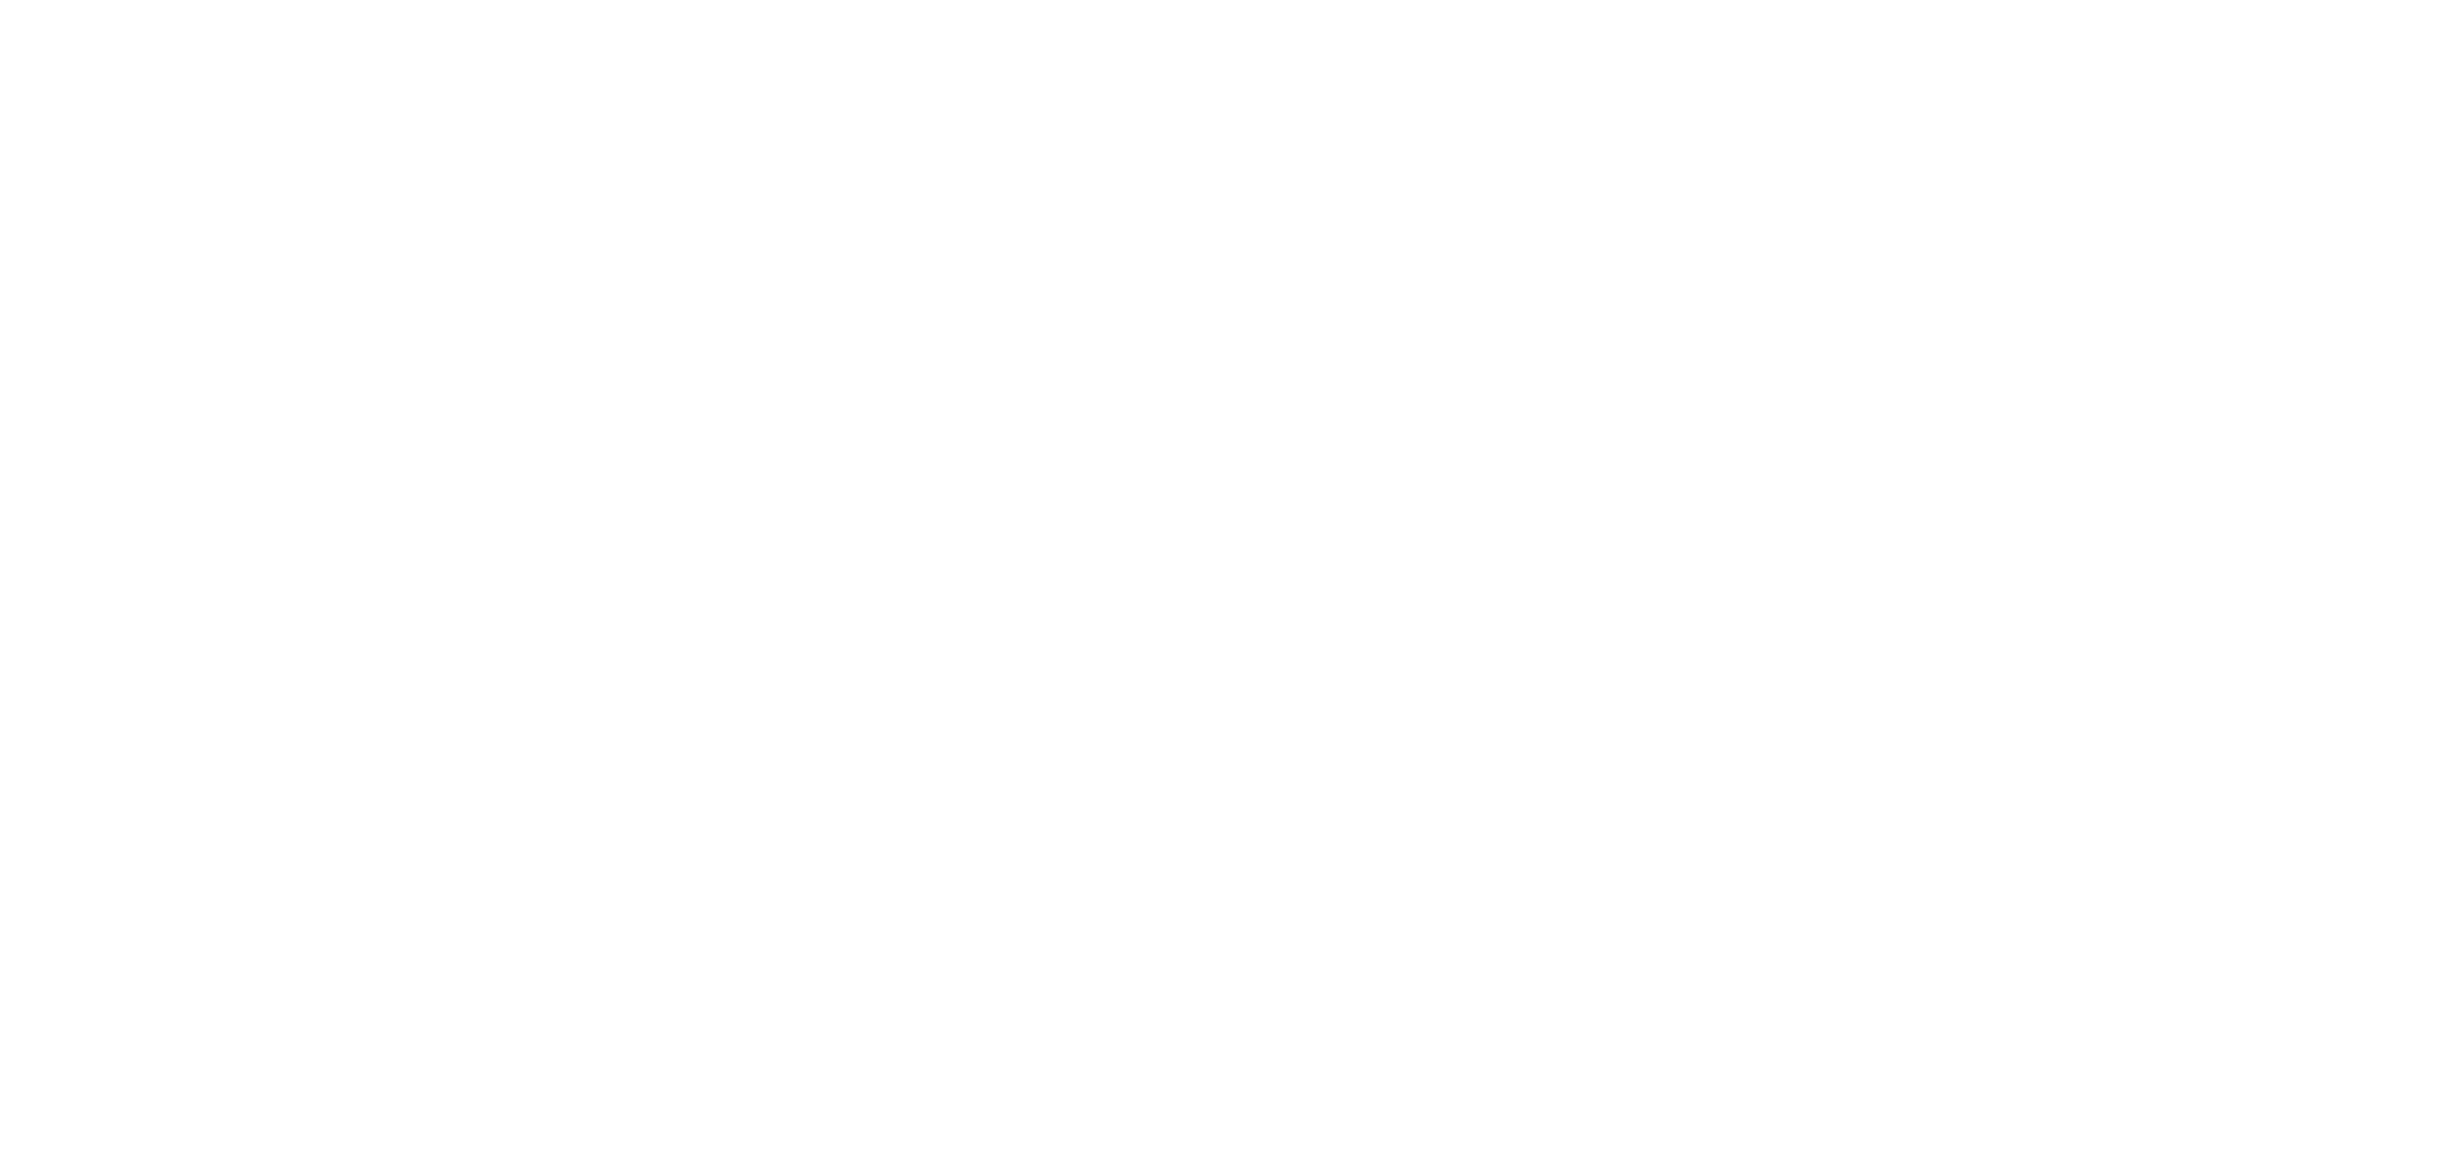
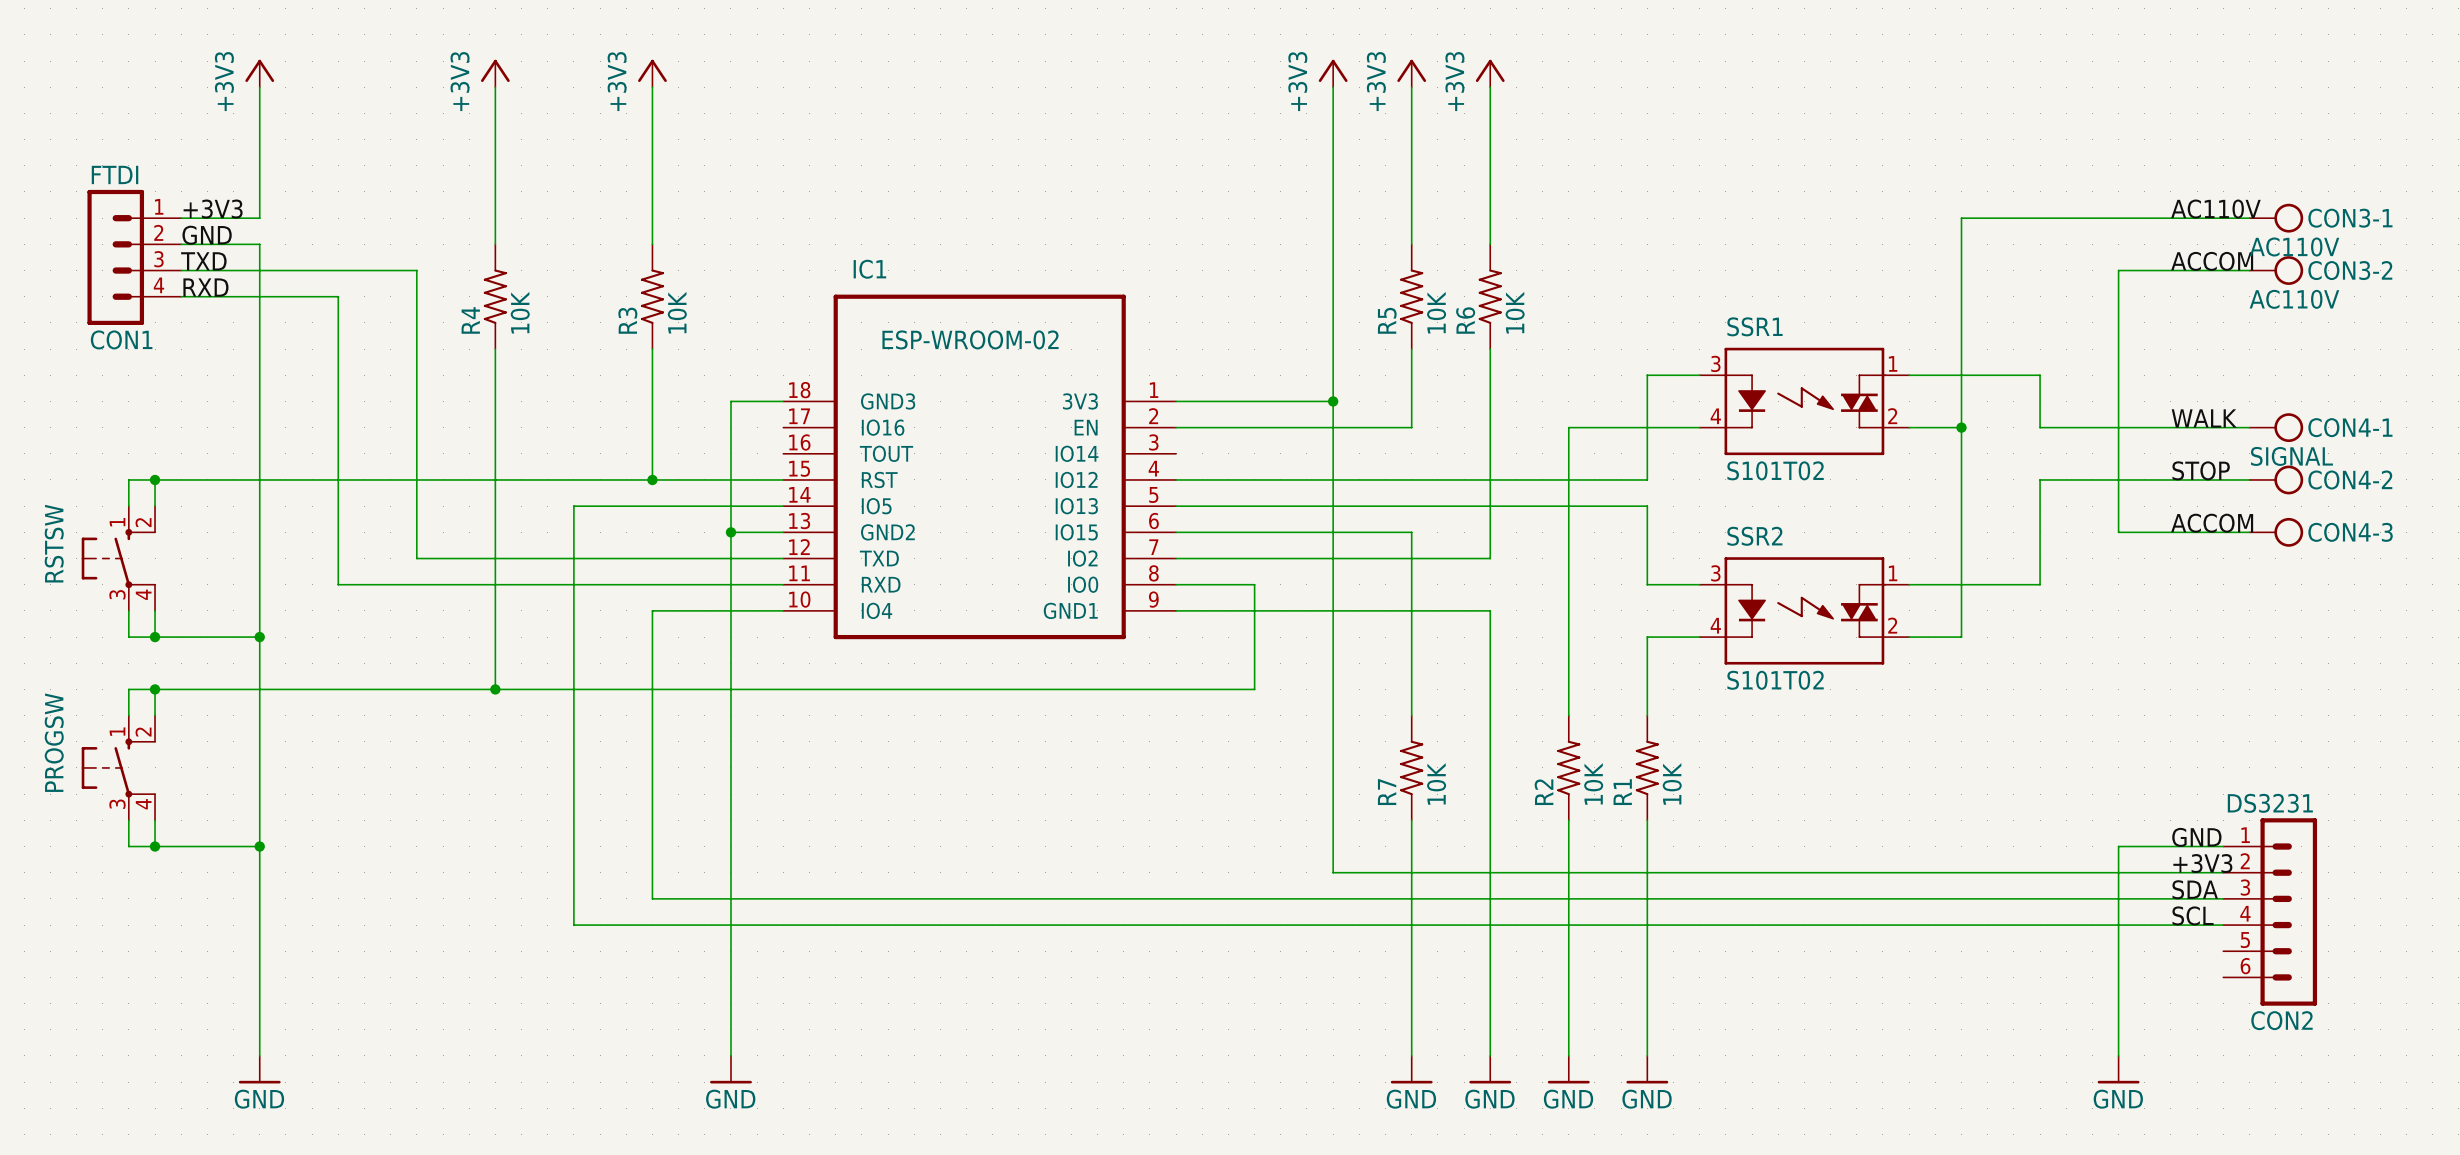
power symbol: none -> +3V3 (259, 73)
power symbol: none -> +3V3 (495, 73)
power symbol: none -> +3V3 (652, 73)
power symbol: none -> +3V3 (1333, 73)
power symbol: none -> +3V3 (1411, 73)
power symbol: none -> +3V3 (1490, 73)
wire: none -> (259, 87) (259, 218) (181, 218)
wire: none -> (495, 87) (495, 244)
wire: none -> (652, 87) (652, 244)
wire: none -> (1333, 87) (1333, 872) (2223, 872)
wire: none -> (1411, 87) (1411, 244)
wire: none -> (1490, 87) (1490, 244)
label: none -> +3V3 (213, 209)
label: none -> AC110V (2215, 209)
wire: none -> (2249, 218) (1961, 218) (1961, 637) (1909, 637)
CON3-1: none -> AC110V (2276, 218)
label: none -> GND (207, 235)
wire: none -> (181, 244) (259, 244) (259, 1055)
CON1: none -> FTDI (134, 257)
label: none -> TXD (203, 261)
label: none -> ACCOM (2212, 261)
wire: none -> (181, 270) (416, 270) (416, 558) (783, 558)
wire: none -> (2249, 270) (2118, 270) (2118, 532) (2249, 532)
CON3-2: none -> AC110V (2276, 270)
label: none -> RXD (205, 287)
wire: none -> (181, 296) (338, 296) (338, 584) (783, 584)
R4: none -> 10K (495, 296)
R3: none -> 10K (652, 296)
R5: none -> 10K (1411, 296)
R6: none -> 10K (1490, 296)
wire: none -> (495, 349) (495, 689)
wire: none -> (652, 349) (652, 479)
wire: none -> (1411, 349) (1411, 427) (1176, 427)
wire: none -> (1490, 349) (1490, 558) (1176, 558)
wire: none -> (1699, 375) (1647, 375) (1647, 479) (1176, 479)
wire: none -> (1909, 375) (2040, 375) (2040, 427) (2249, 427)
wire: none -> (783, 401) (730, 401) (730, 1055)
wire: none -> (1176, 401) (1333, 401)
junction: none -> (1333, 401)
SSR1: none -> S101T02 (1804, 401)
label: none -> WALK (2204, 418)
wire: none -> (1699, 427) (1568, 427) (1568, 715)
wire: none -> (1909, 427) (1961, 427)
junction: none -> (1961, 427)
CON4-1: none -> SIGNAL (2276, 427)
IC1: none -> ESP-WROOM-02 (979, 466)
label: none -> STOP (2201, 470)
wire: none -> (155, 479) (155, 506)
junction: none -> (155, 479)
junction: none -> (652, 479)
wire: none -> (783, 479) (128, 479) (128, 506)
wire: none -> (2249, 479) (2040, 479) (2040, 584) (1909, 584)
CON4-2: none -> (2276, 479)
wire: none -> (783, 506) (573, 506) (573, 925) (2223, 925)
wire: none -> (1176, 506) (1647, 506) (1647, 584) (1699, 584)
label: none -> ACCOM (2212, 523)
wire: none -> (730, 532) (783, 532)
junction: none -> (730, 532)
wire: none -> (1176, 532) (1411, 532) (1411, 715)
CON4-3: none -> (2276, 532)
RSTSW: none -> (118, 558)
wire: none -> (1176, 584) (1254, 584) (1254, 689) (128, 689) (128, 715)
wire: none -> (128, 610) (128, 637) (259, 637)
wire: none -> (155, 610) (155, 637)
wire: none -> (783, 610) (652, 610) (652, 898) (2223, 898)
wire: none -> (1176, 610) (1490, 610) (1490, 1055)
SSR2: none -> S101T02 (1804, 610)
junction: none -> (155, 637)
junction: none -> (259, 637)
wire: none -> (1699, 637) (1647, 637) (1647, 715)
wire: none -> (155, 689) (155, 715)
junction: none -> (155, 689)
junction: none -> (495, 689)
PROGSW: none -> (118, 767)
R7: none -> 10K (1411, 767)
R2: none -> 10K (1568, 767)
R1: none -> 10K (1647, 767)
wire: none -> (128, 820) (128, 846) (259, 846)
wire: none -> (155, 820) (155, 846)
wire: none -> (1411, 820) (1411, 1055)
wire: none -> (1568, 820) (1568, 1055)
wire: none -> (1647, 820) (1647, 1055)
label: none -> GND (2196, 837)
junction: none -> (155, 846)
junction: none -> (259, 846)
wire: none -> (2223, 846) (2118, 846) (2118, 1055)
label: none -> +3V3 (2202, 863)
label: none -> SDA (2195, 889)
CON2: none -> DS3231 (2270, 911)
label: none -> SCL (2193, 915)
power symbol: none -> GND (259, 1069)
power symbol: none -> GND (730, 1069)
power symbol: none -> GND (1411, 1069)
power symbol: none -> GND (1490, 1069)
power symbol: none -> GND (1568, 1069)
power symbol: none -> GND (1647, 1069)
power symbol: none -> GND (2118, 1069)

